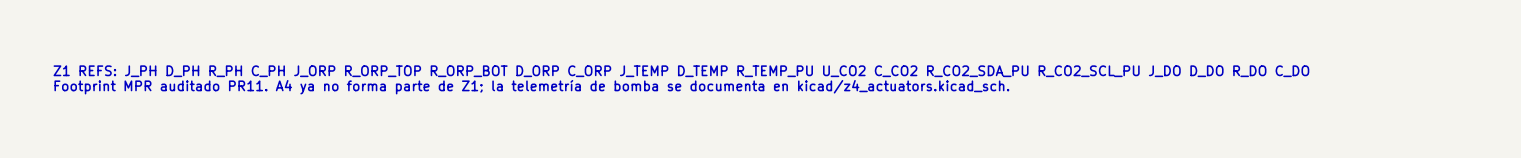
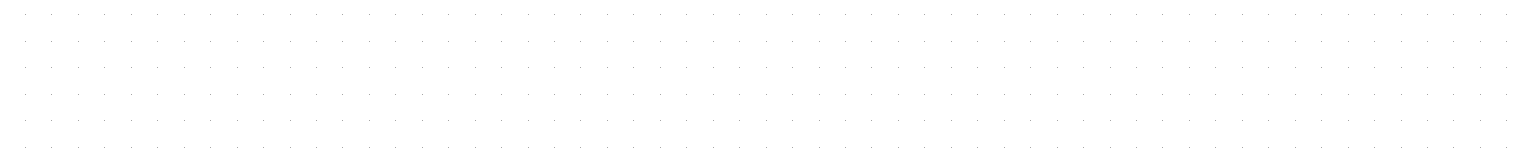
text: Z1 REFS: J_PH D_PH R_PH C_PH J_ORP R_ORP_TOP R_ORP_BOT D_ORP C_ORP J_TEMP D_TEMP R_TEMP_PU U_CO2 C_CO2 R_CO2_SDA_PU R_CO2_SCL_PU J_DO D_DO R_DO C_DO (681, 71) -> none
text: Footprint MPR auditado PR11. A4 ya no forma parte de Z1; la telemetría de bomba se documenta en kicad/z4_actuators.kicad_sch. (531, 87) -> none

